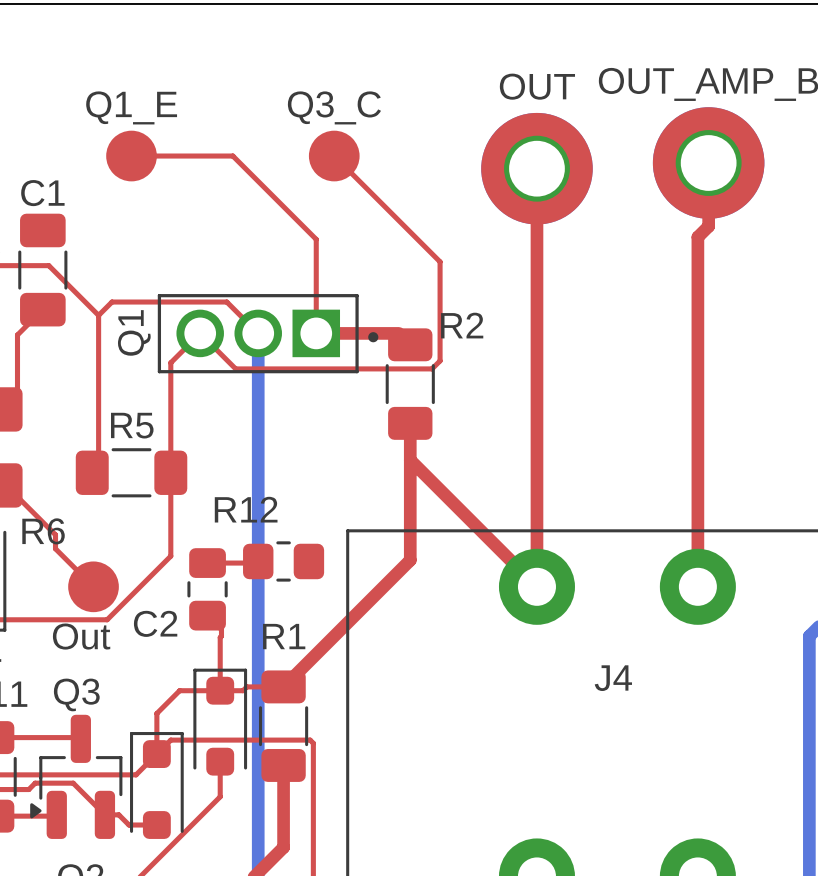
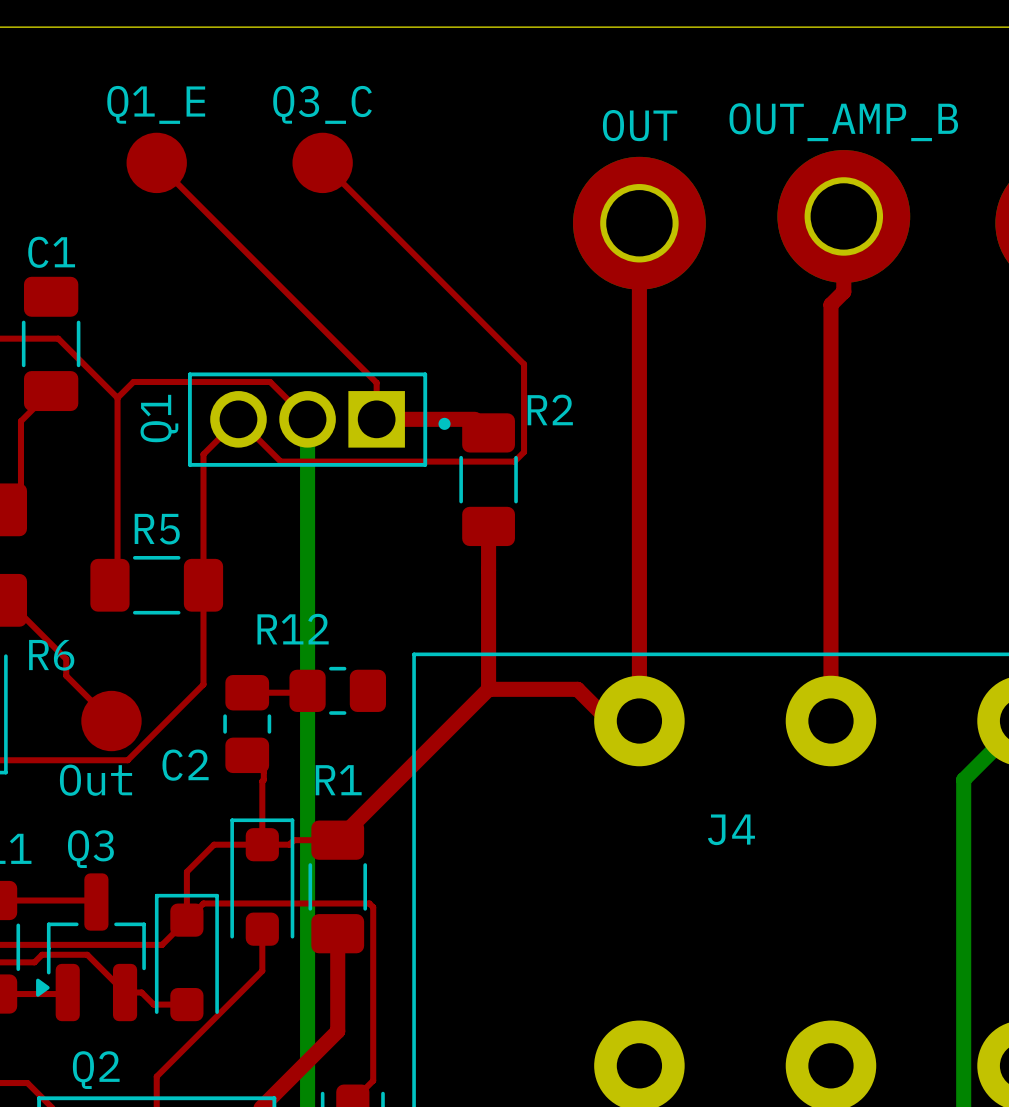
top track: (131, 156) (232, 156) (316, 239) (316, 302) -> (156, 162) (376, 382)
Q1_E position: (131, 156) -> (156, 162)
top track: (334, 156) (440, 261) (440, 287) -> (322, 162) (524, 364)
Q3_C position: (334, 156) -> (322, 162)
top track: (410, 460) (536, 586) -> (488, 689) (577, 689) (609, 721) (639, 721)

